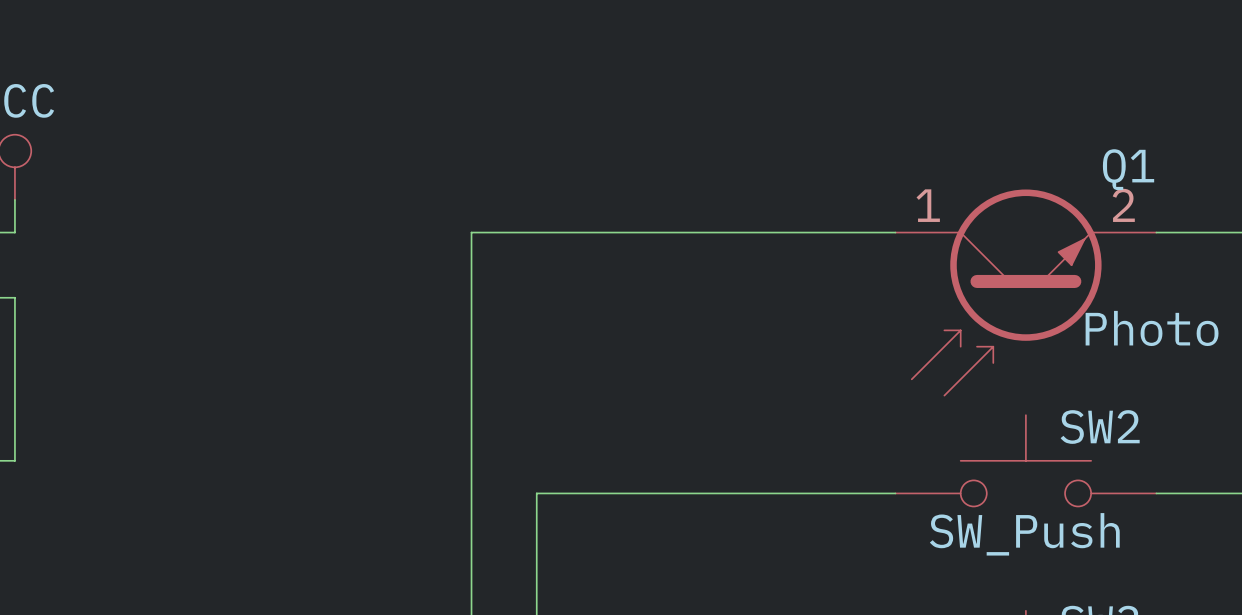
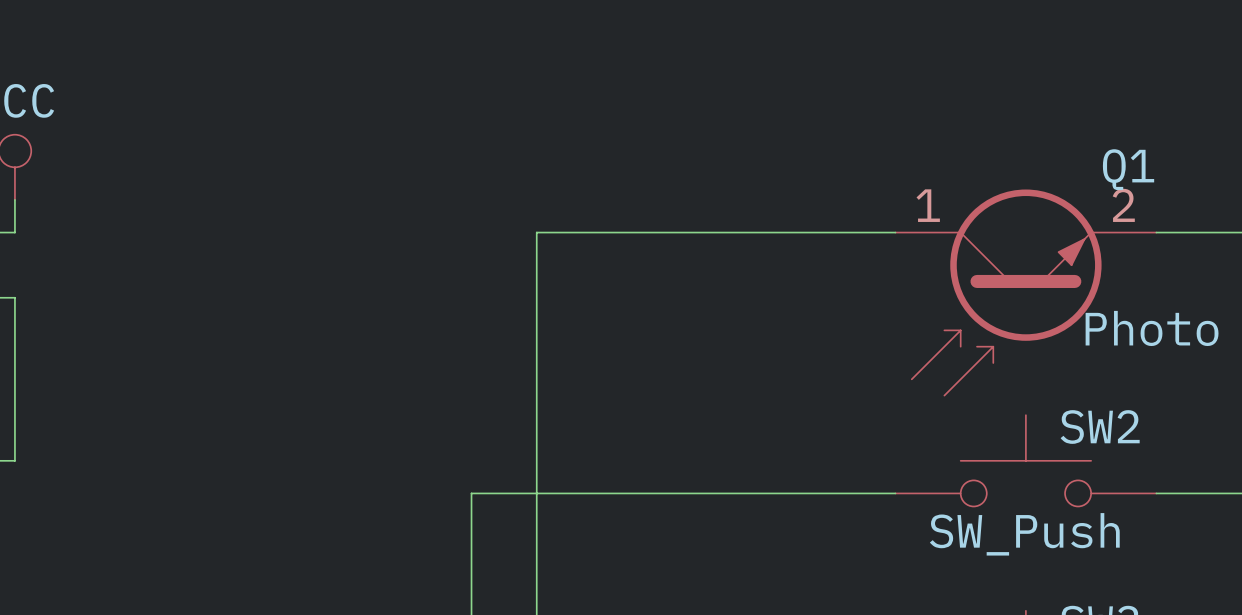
wire: (536, 232) (471, 232) (471, 493) -> (536, 232) (536, 493) (471, 493)

